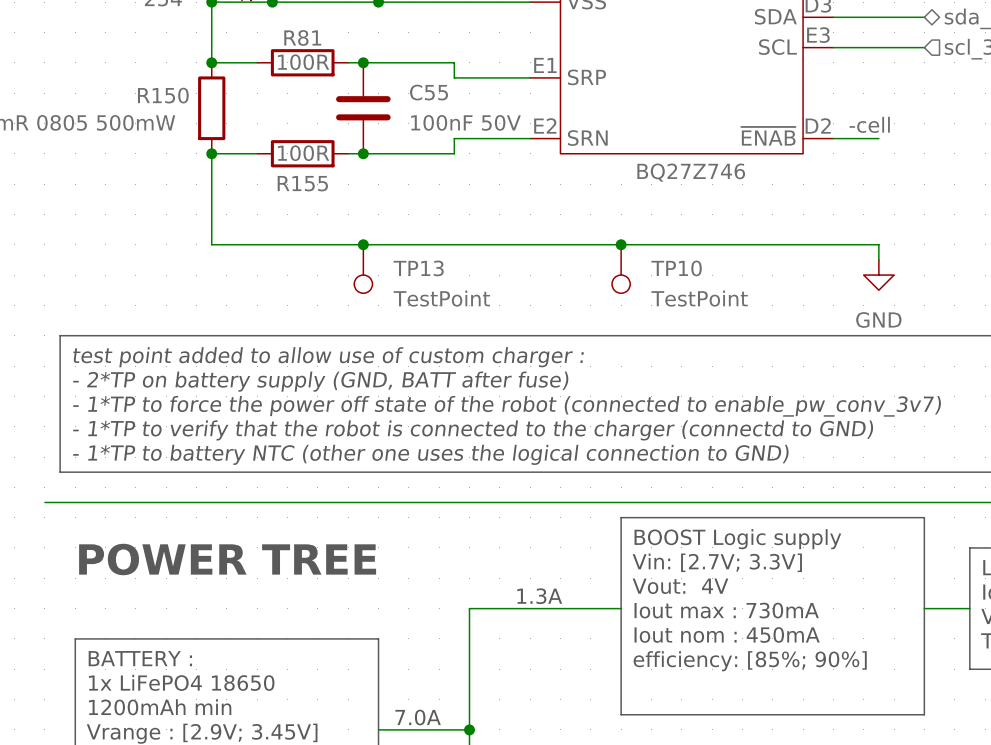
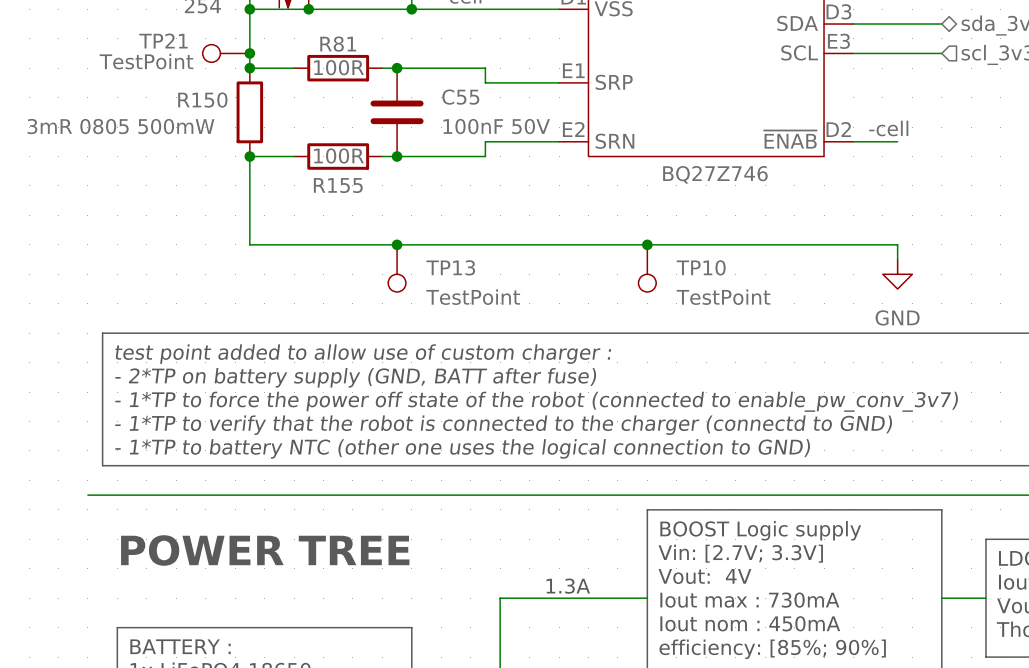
TP21: none -> TestPoint (226, 53)
junction: none -> (249, 53)

